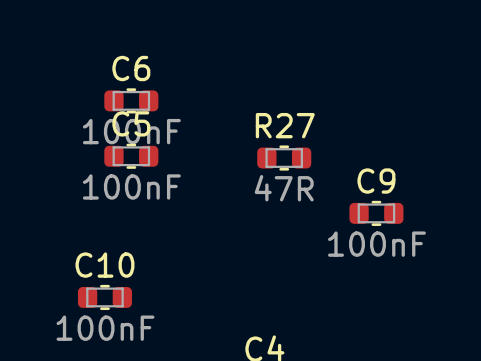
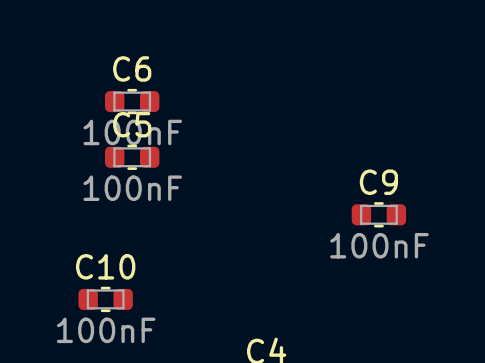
R27: 47R (284, 158) -> none

